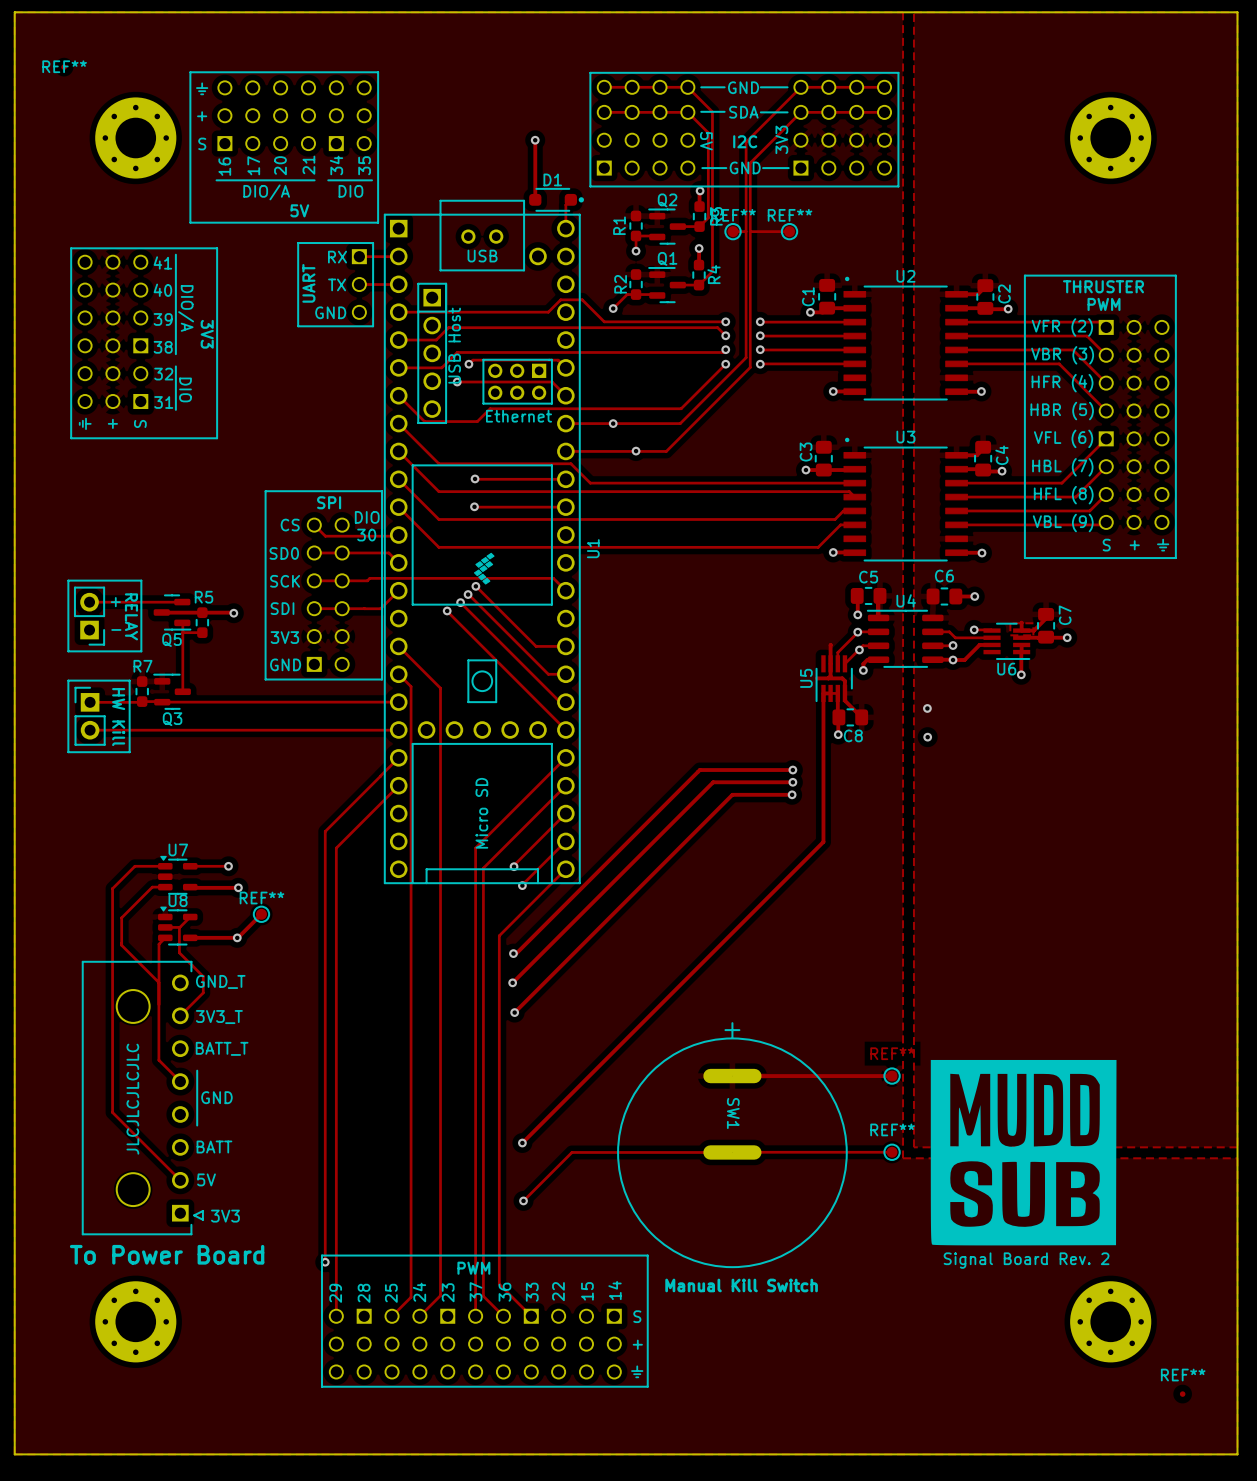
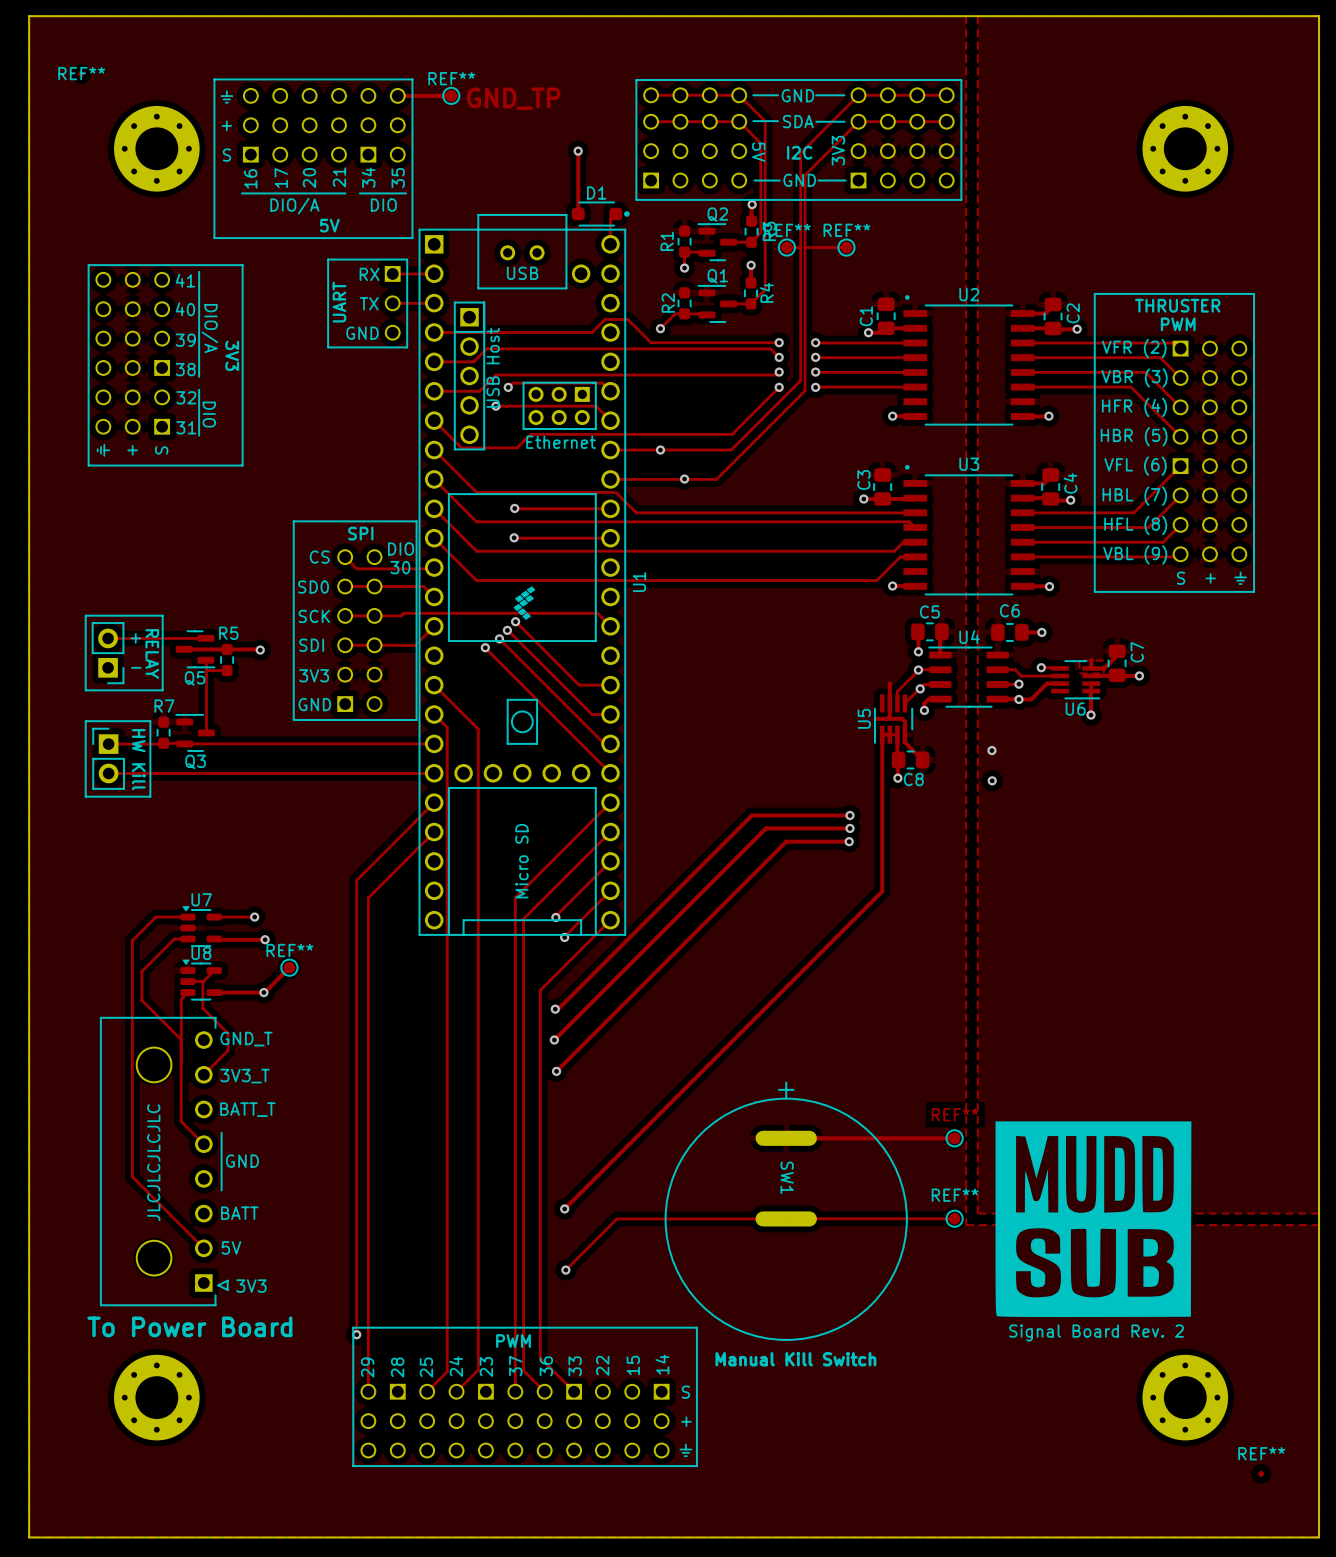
track: none -> (397, 95) (451, 95)
REF**: none -> (451, 95)
text: none -> GND_TP (513, 98)

